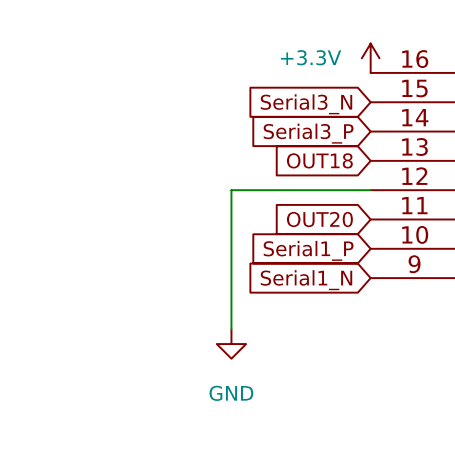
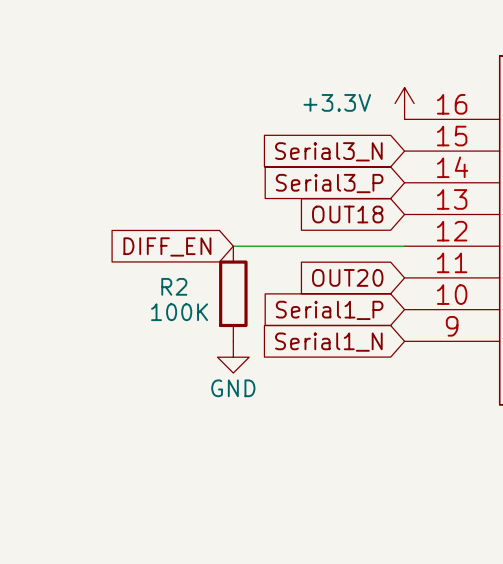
wire: (231, 190) (231, 329) -> (253, 246) (233, 246)
global label: none -> DIFF_EN (167, 246)
R2: none -> 100K (233, 293)
power symbol position: GND (231, 344) -> GND (233, 357)
power symbol text position: GND (231, 393) -> GND (233, 388)

